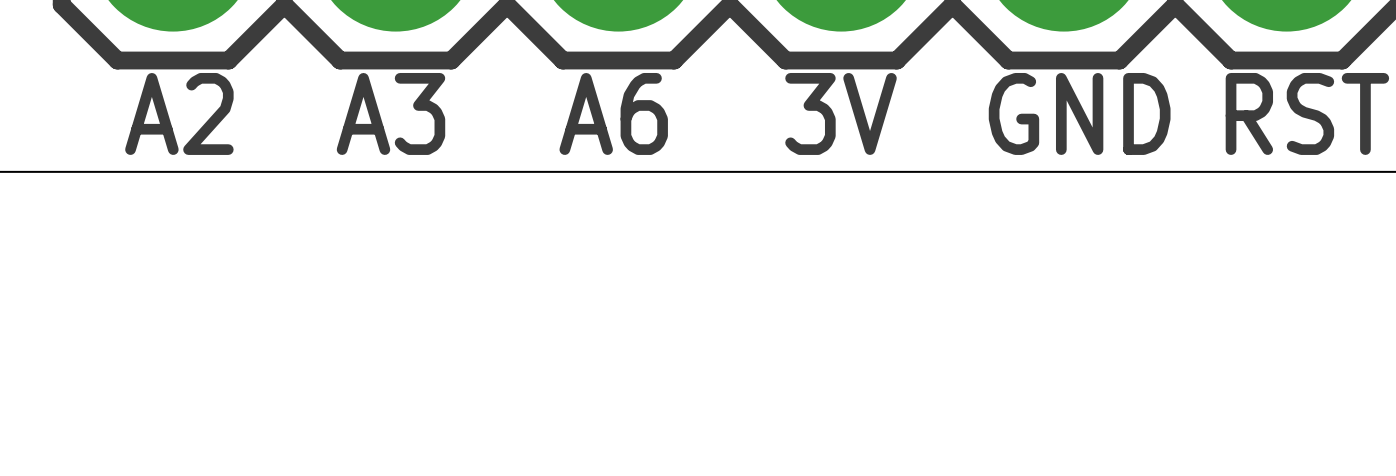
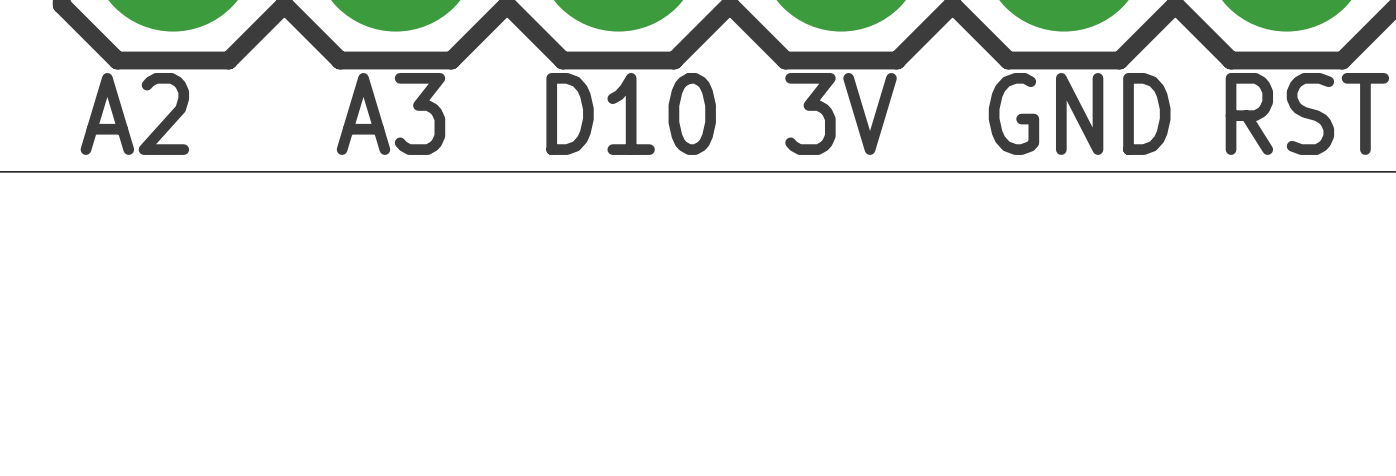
text position: A2 (179, 113) -> A2 (134, 113)
text: A6 (613, 113) -> D10 (631, 113)

